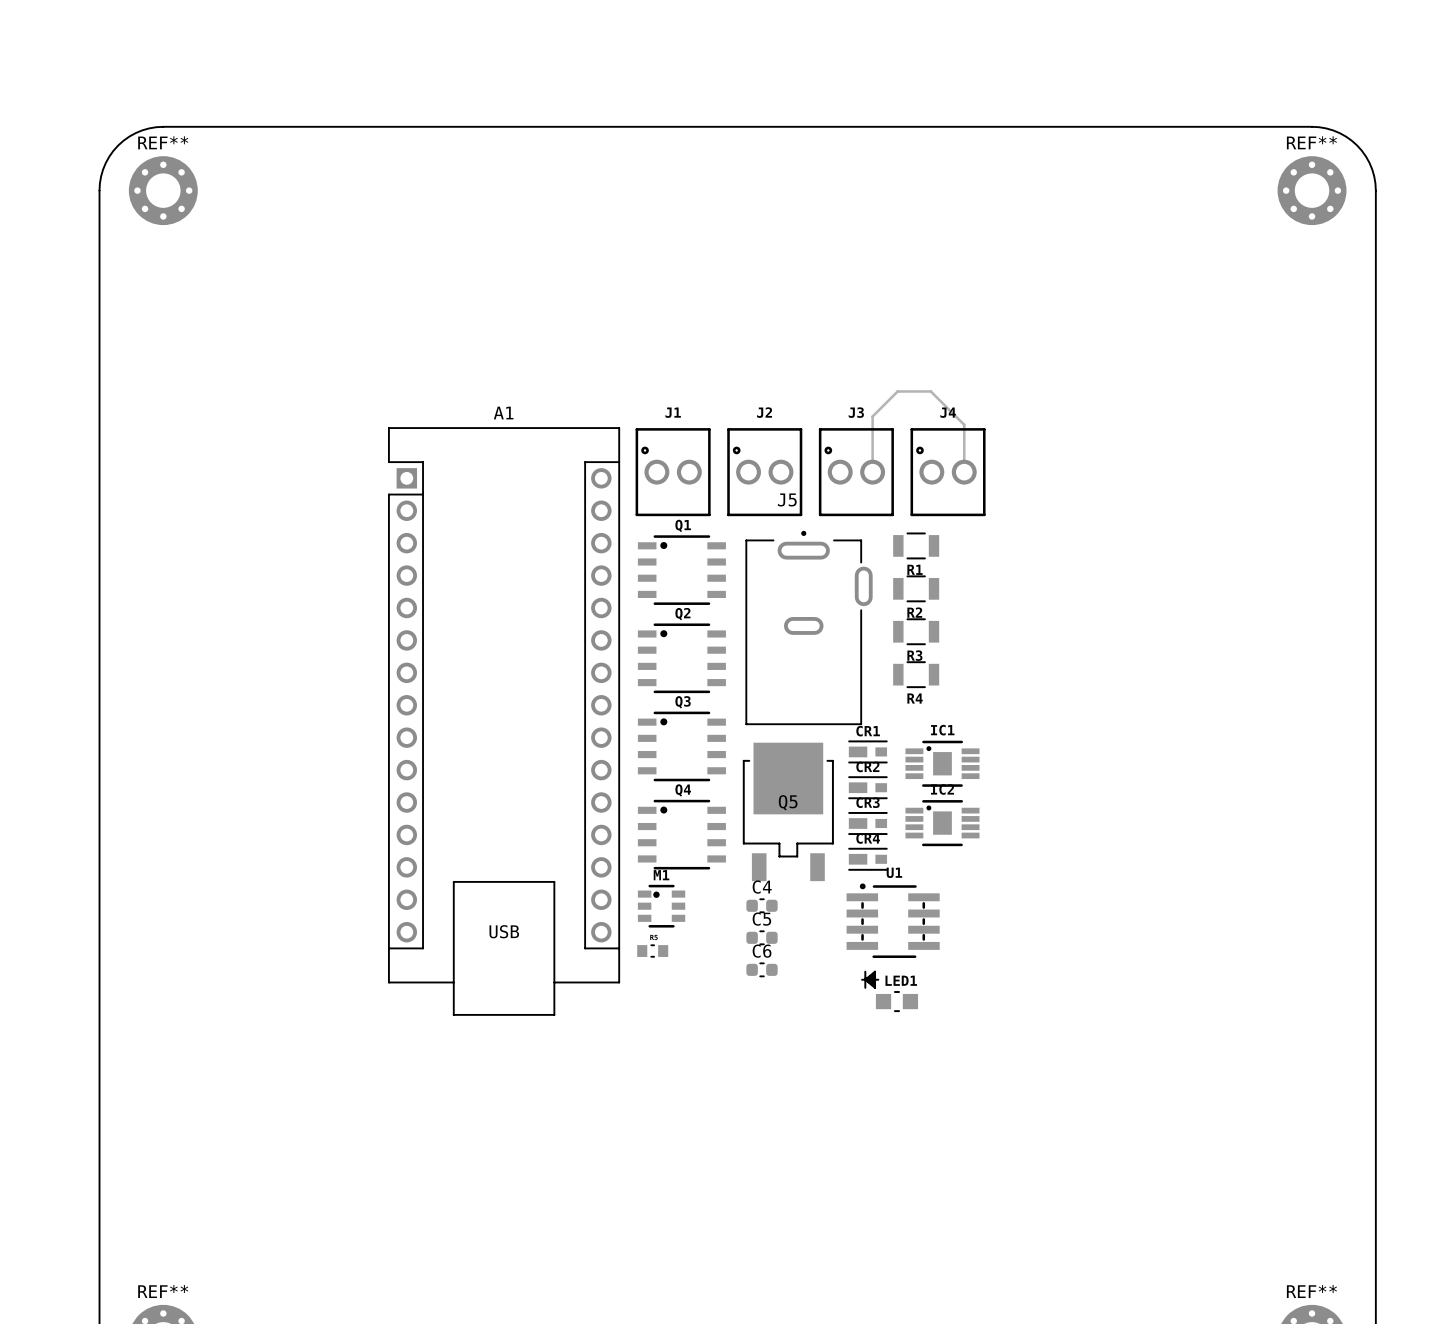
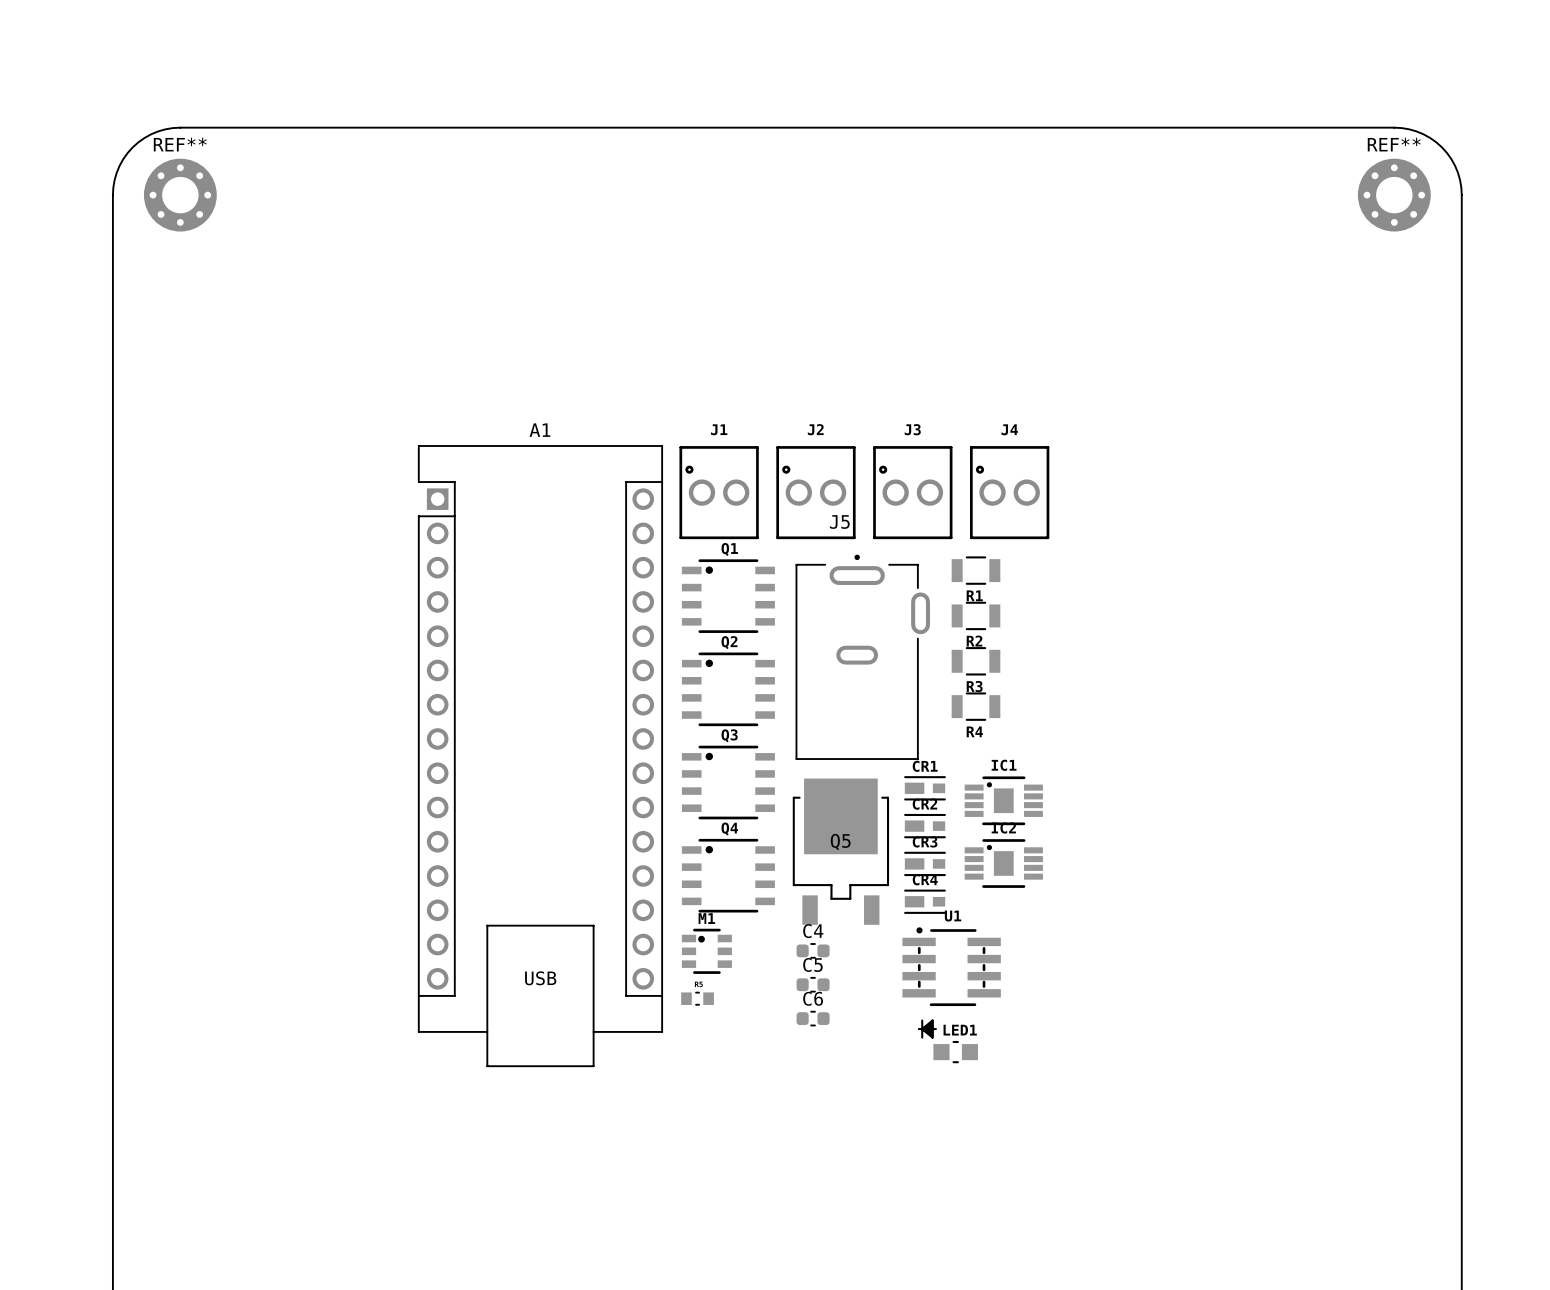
track: (872, 472) (872, 416) (897, 391) (930, 391) (964, 424) (964, 472) -> none

